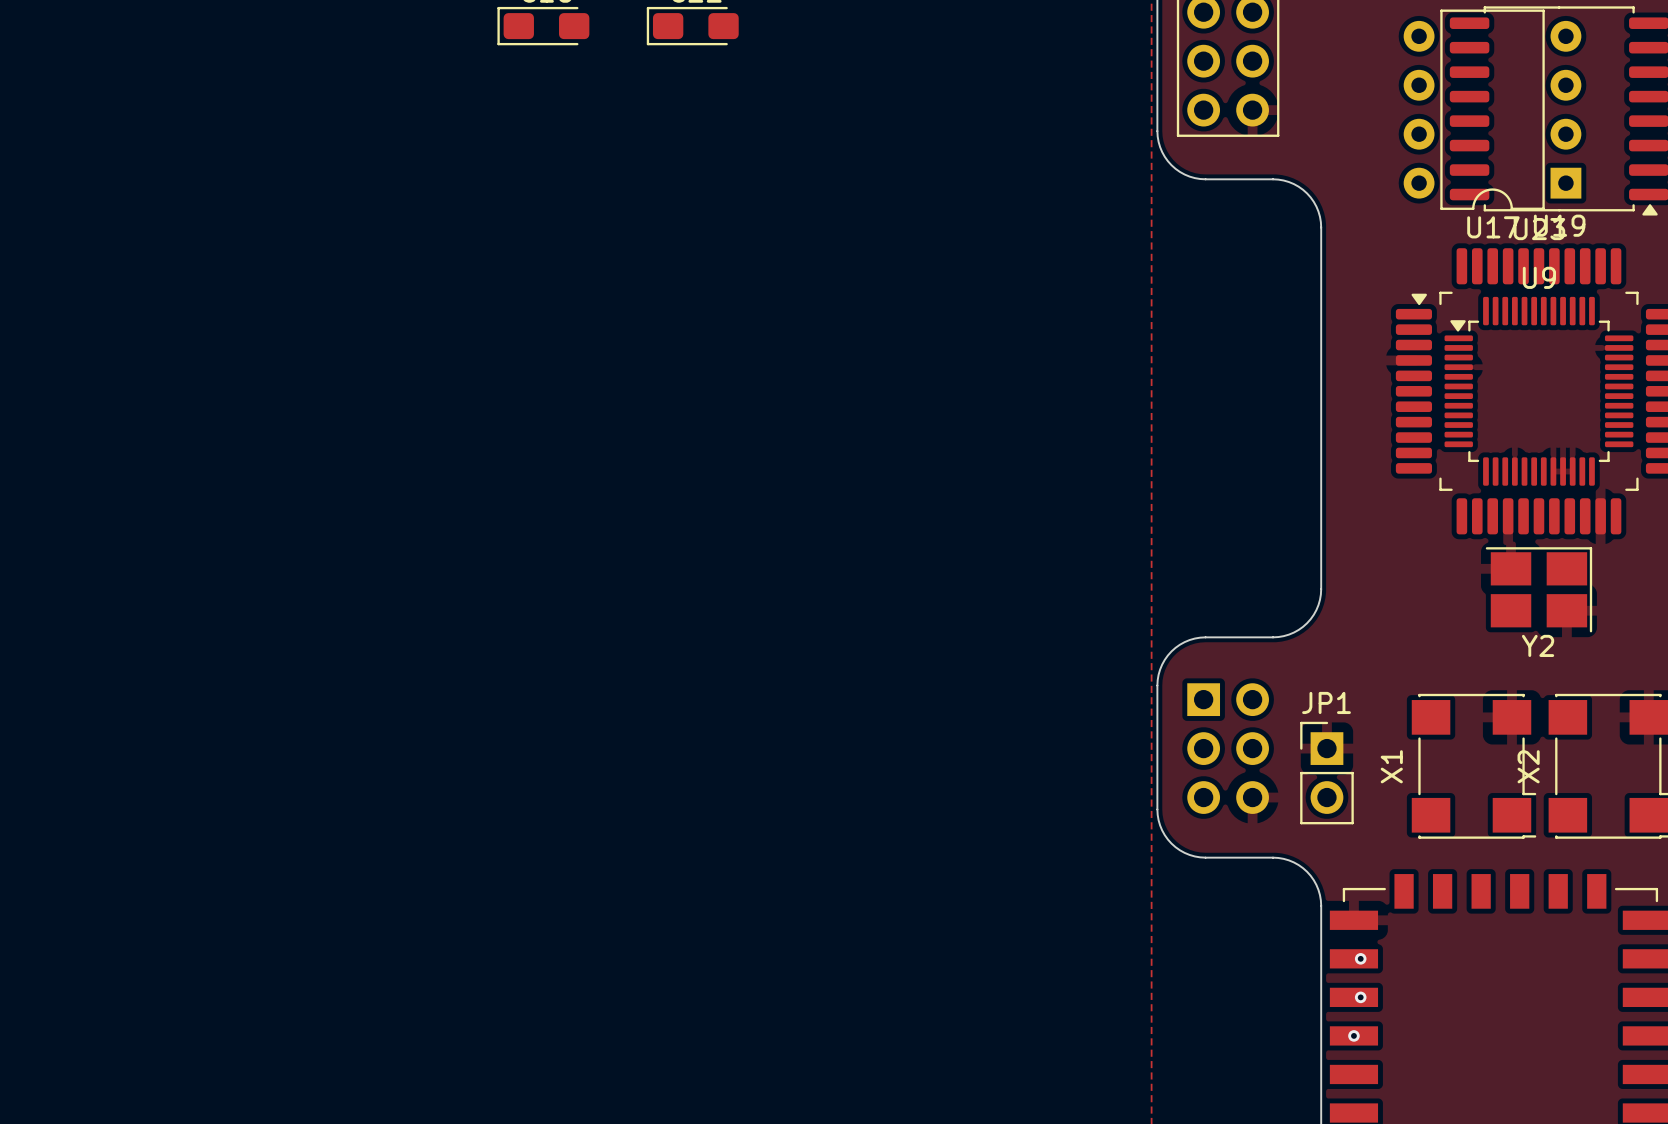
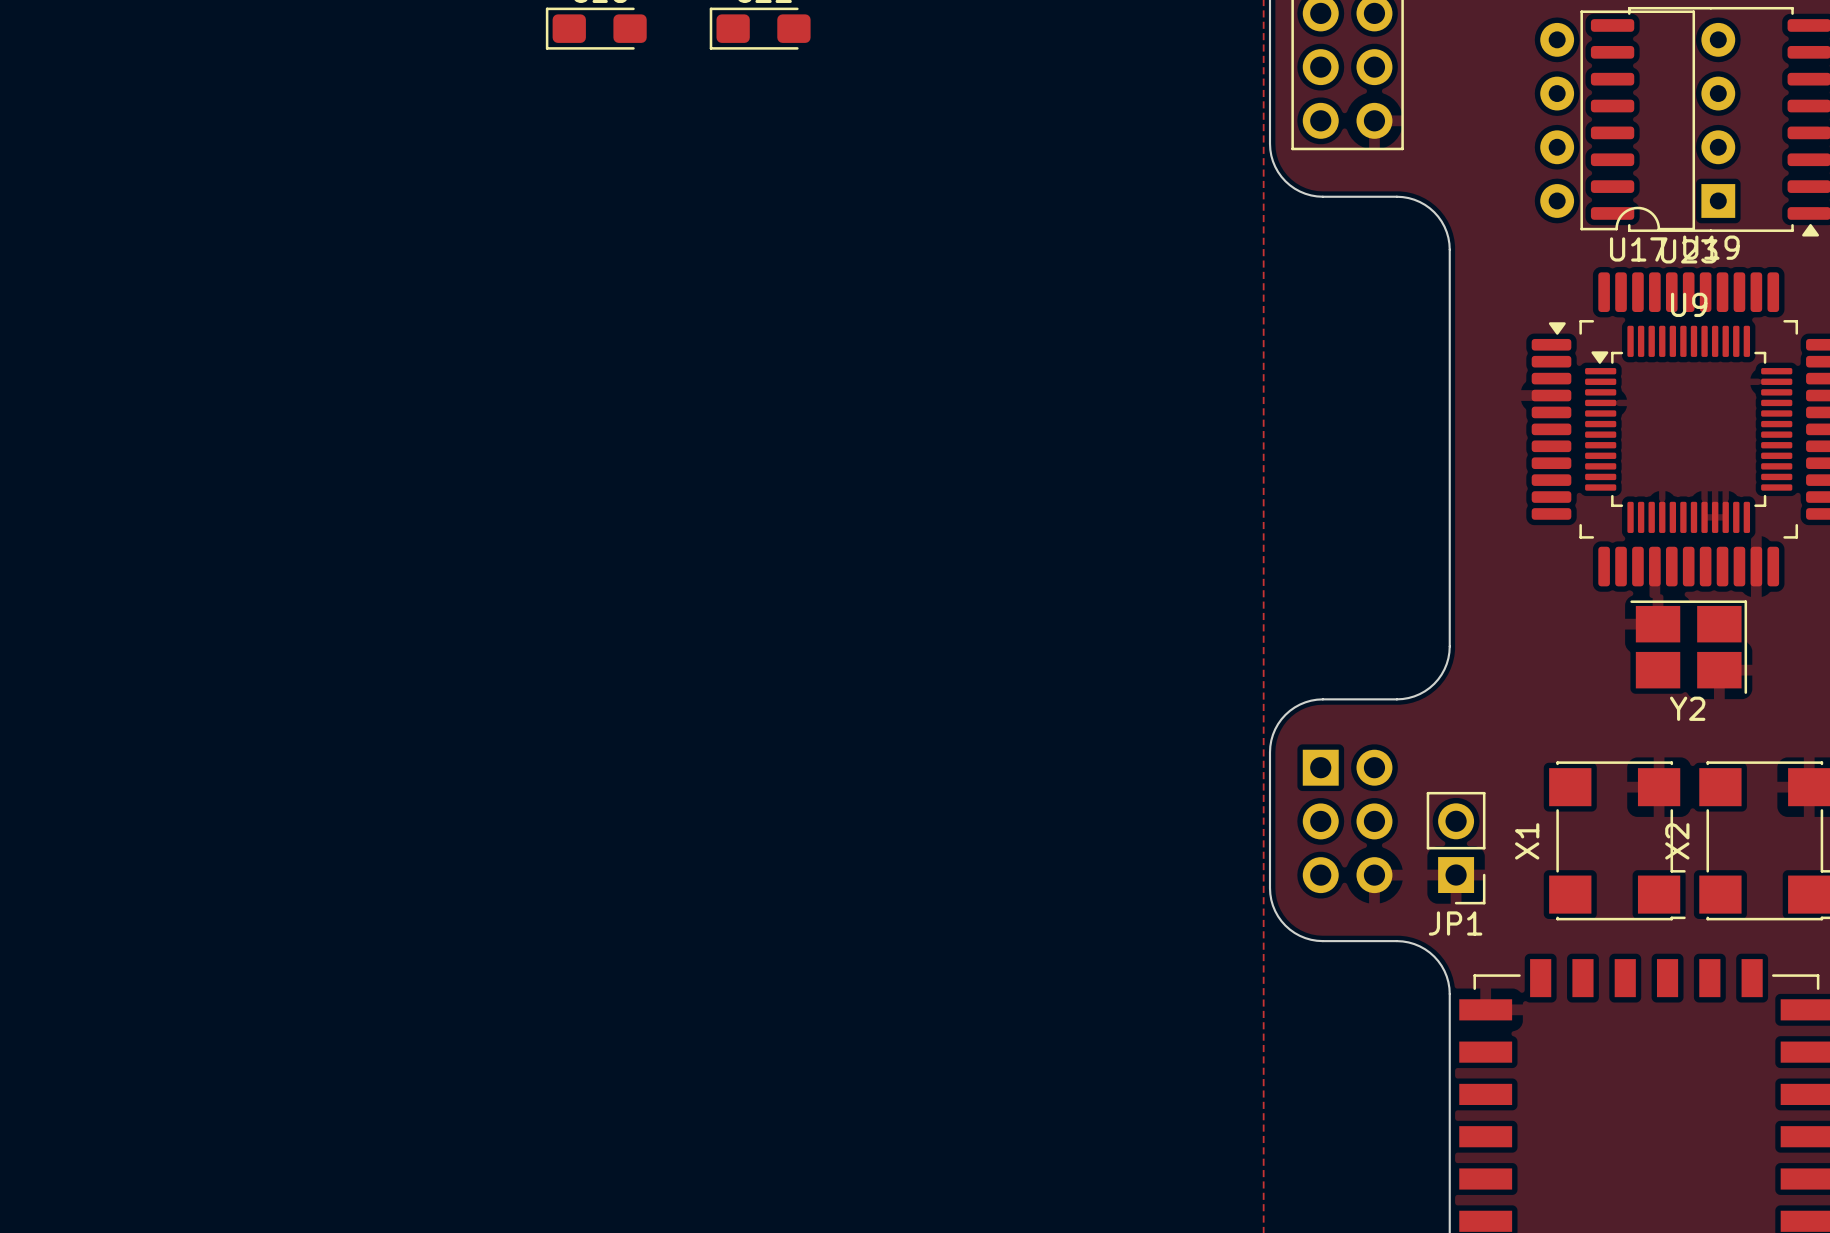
JP1 rotation: 0° (1326, 773) -> 180° (1456, 848)
via: (1360, 958) -> none
via: (1360, 997) -> none
via: (1353, 1035) -> none

